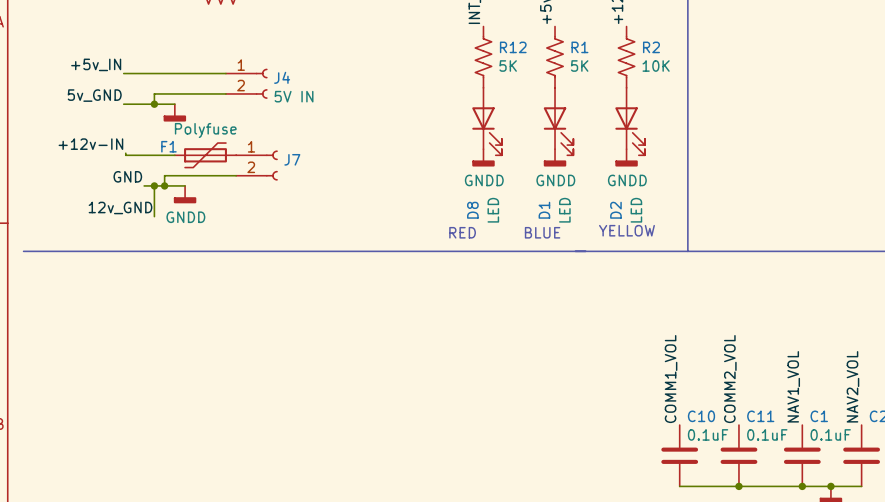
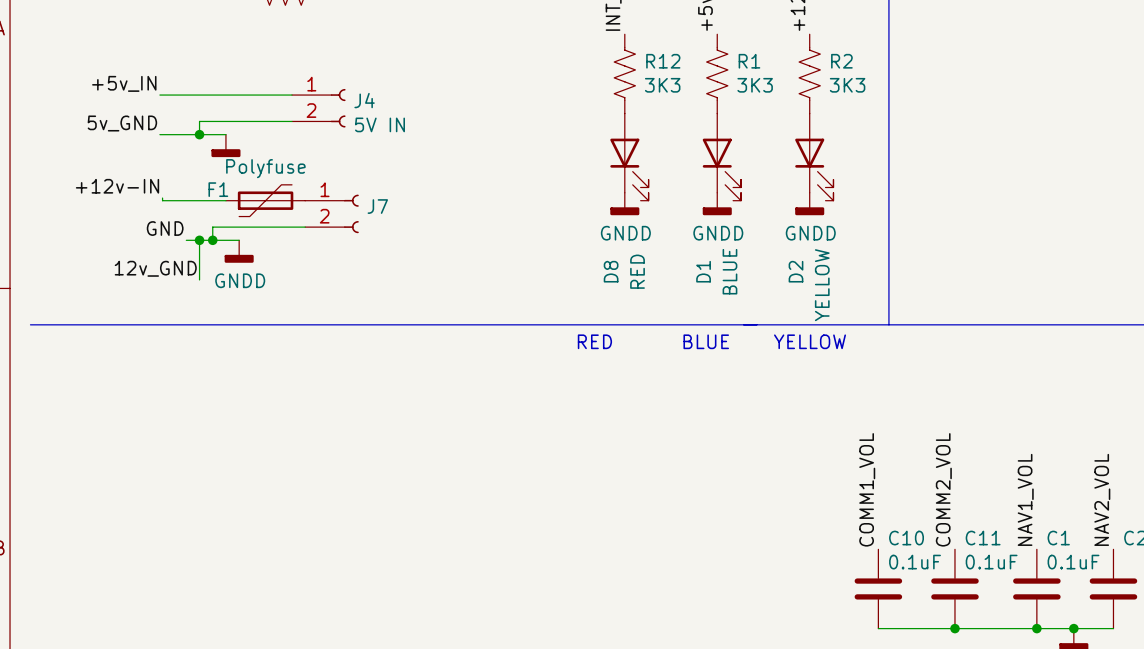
R12 value: 5K (508, 66) -> 3K3 (662, 85)
R1 value: 5K (579, 66) -> 3K3 (755, 85)
R2 value: 10K (656, 66) -> 3K3 (847, 85)
D8 value: LED (493, 210) -> RED (637, 271)
D1 value: LED (564, 210) -> BLUE (729, 271)
D2 value: LED (636, 210) -> YELLOW (822, 285)
text position: YELLOW (626, 230) -> YELLOW (810, 341)
text position: RED (462, 232) -> RED (594, 341)
text position: BLUE (542, 232) -> BLUE (706, 341)

